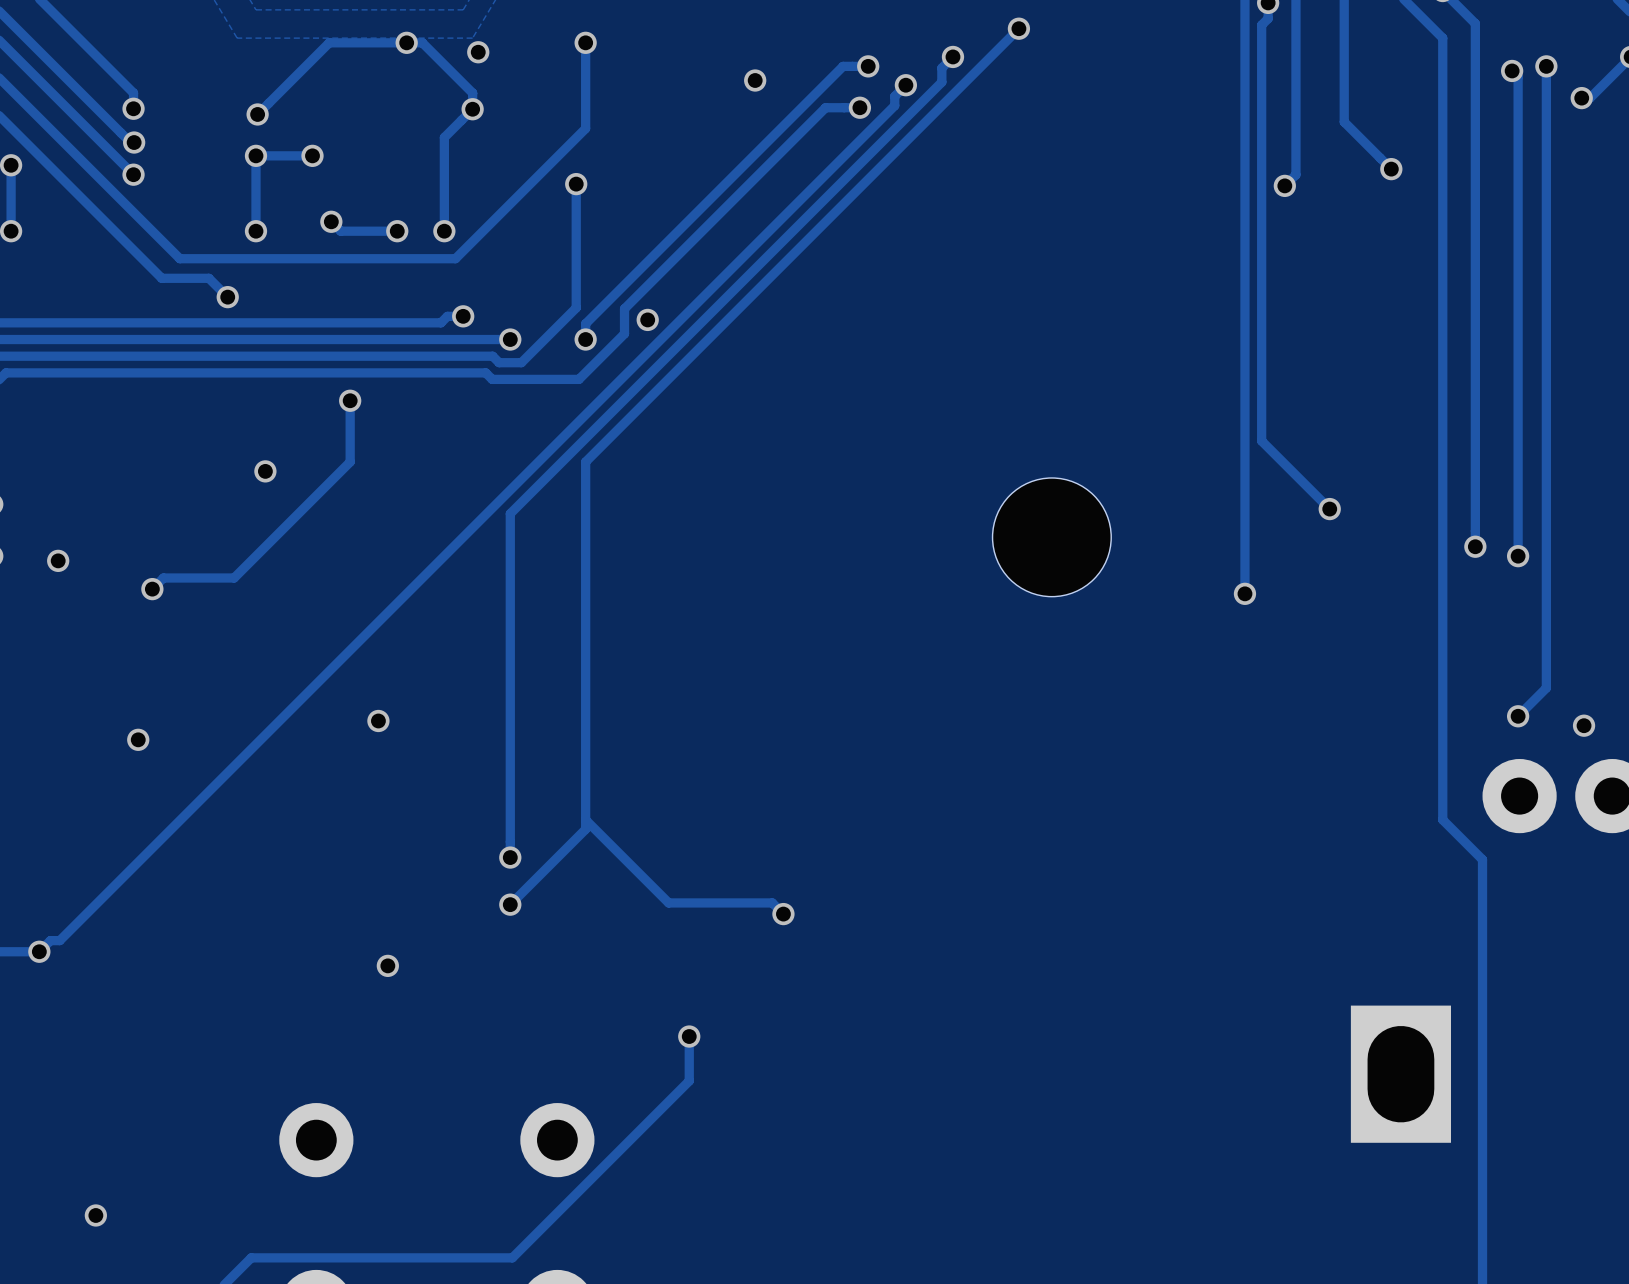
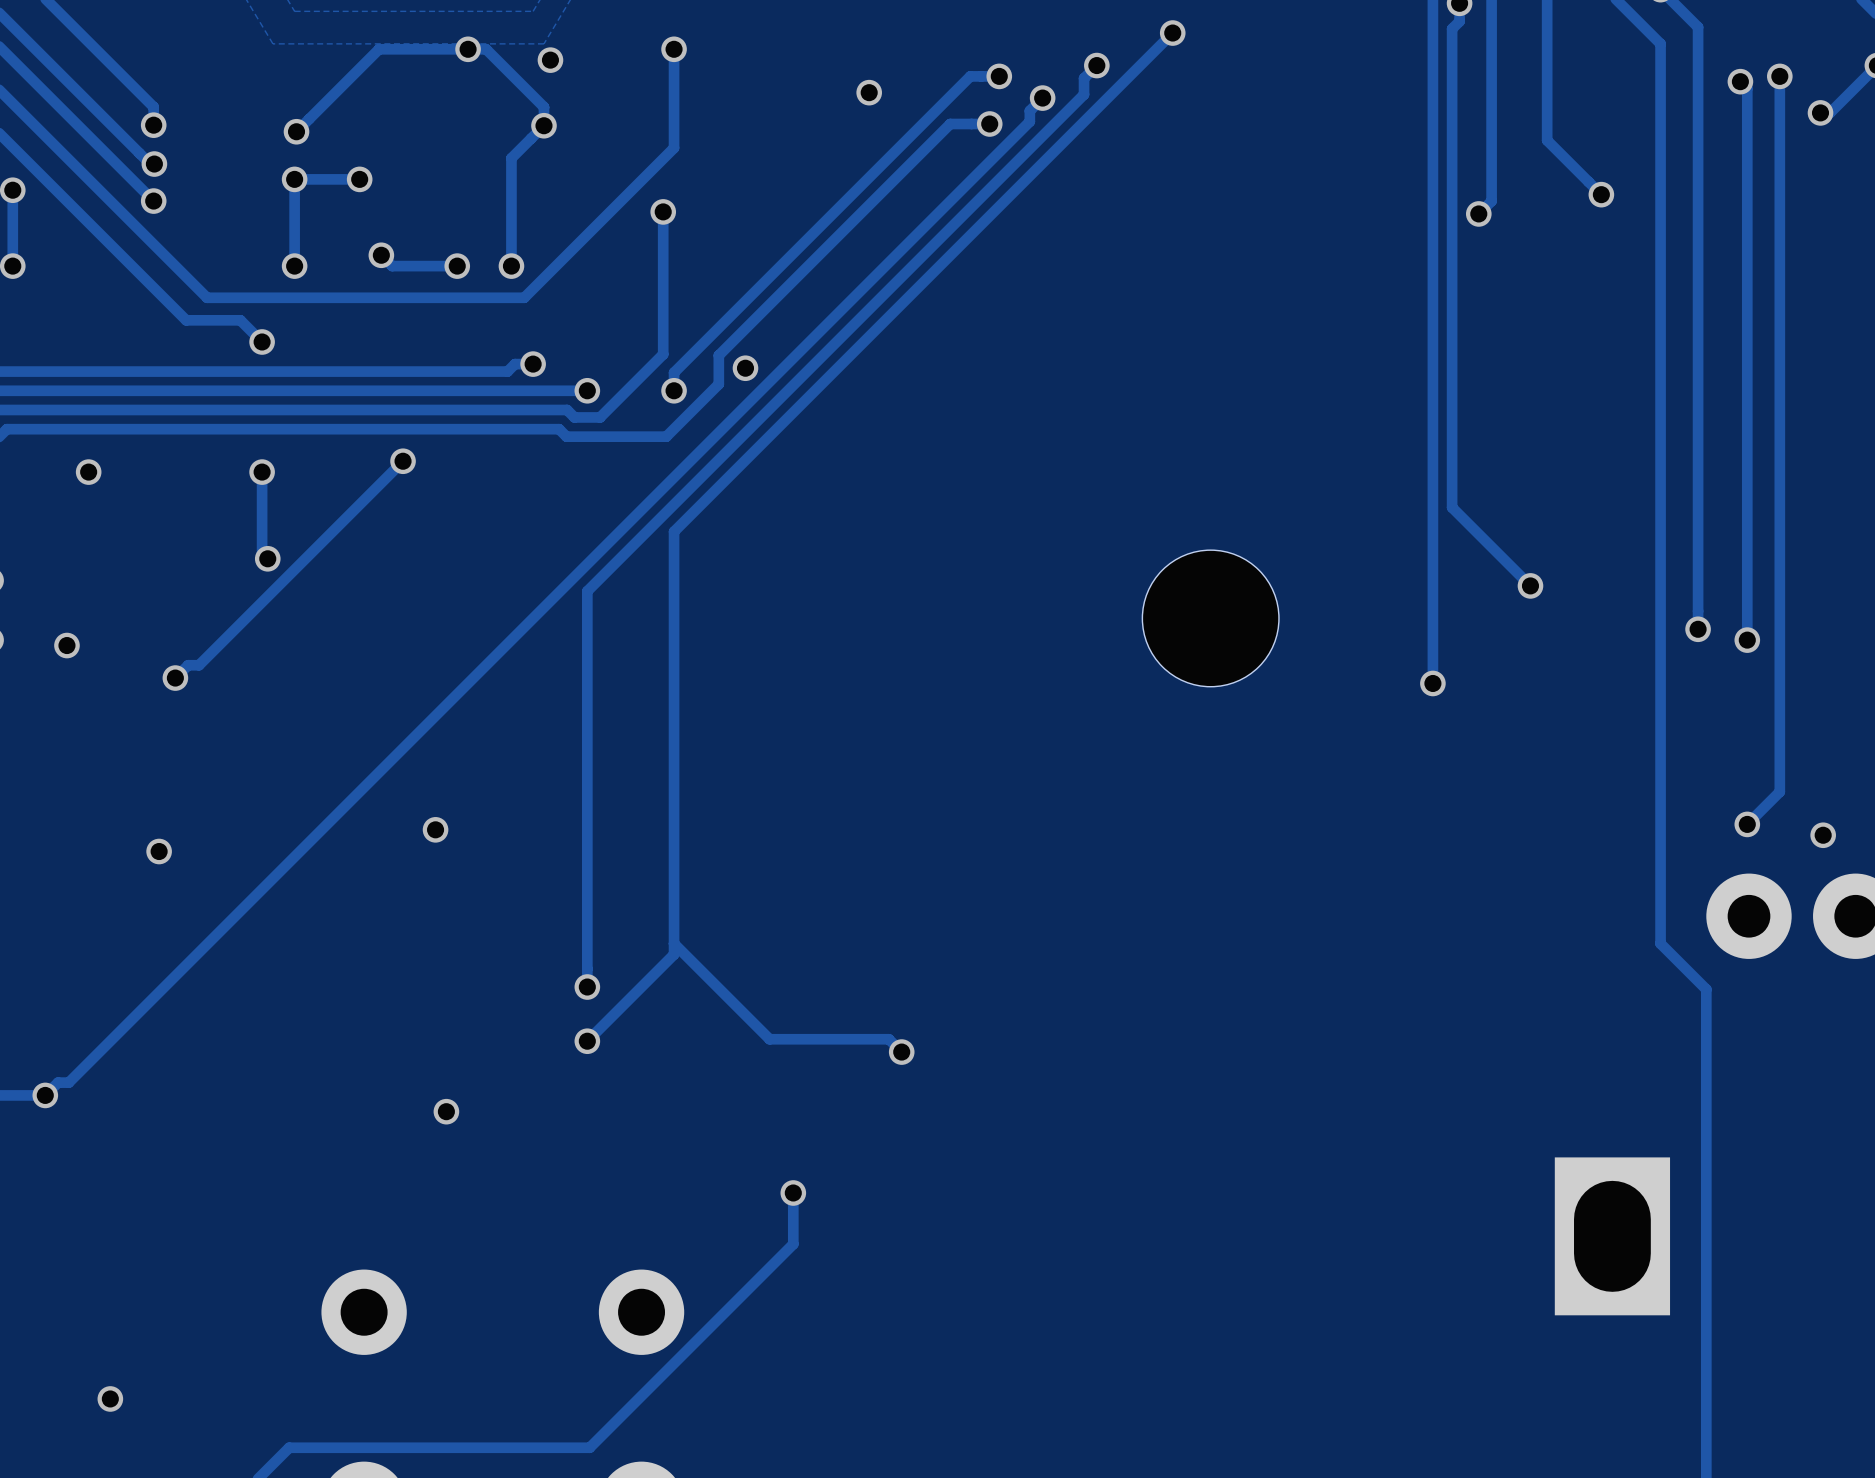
track: (350, 400) (350, 461) (234, 578) (172, 578) -> (403, 461) (199, 665)
via: none -> (88, 472)
track: none -> (262, 472) (262, 553) (267, 558)
via: none -> (262, 472)
via: (265, 471) -> none
via: none -> (267, 558)

